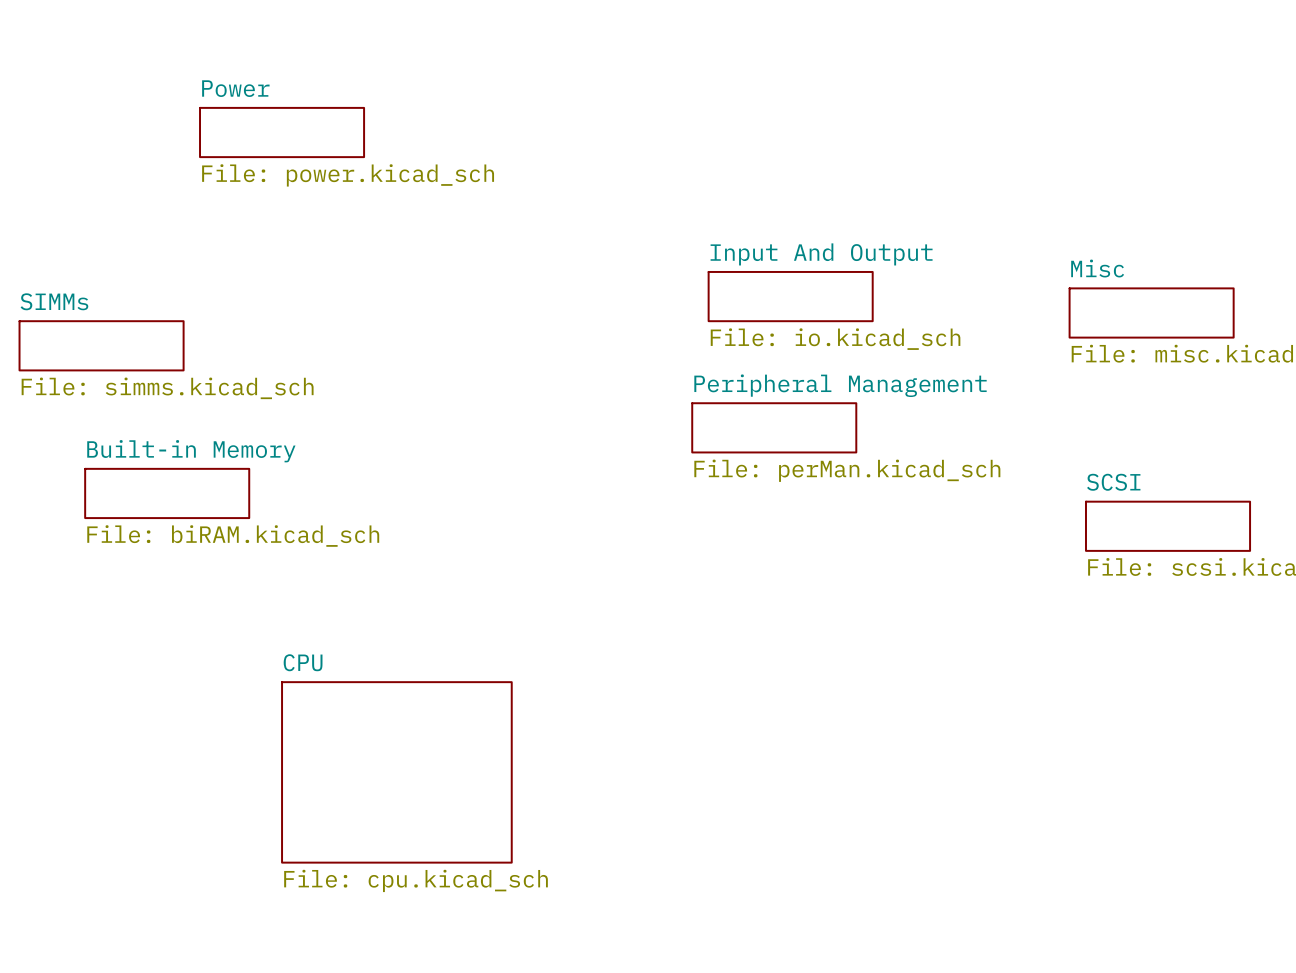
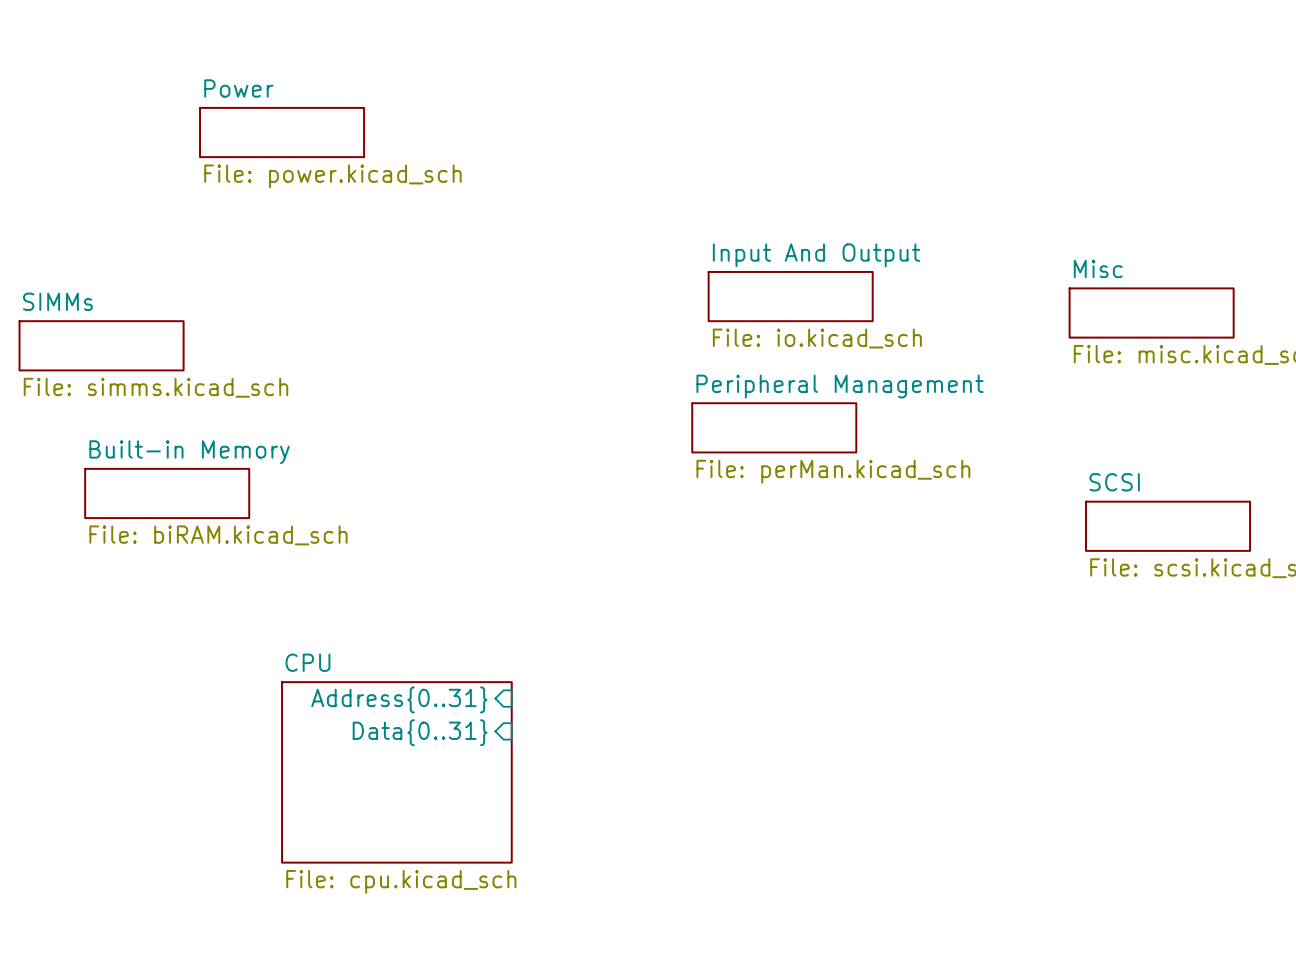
sheet pin: none -> Address{0..31} (399, 699)
sheet pin: none -> Data{0..31} (420, 732)

